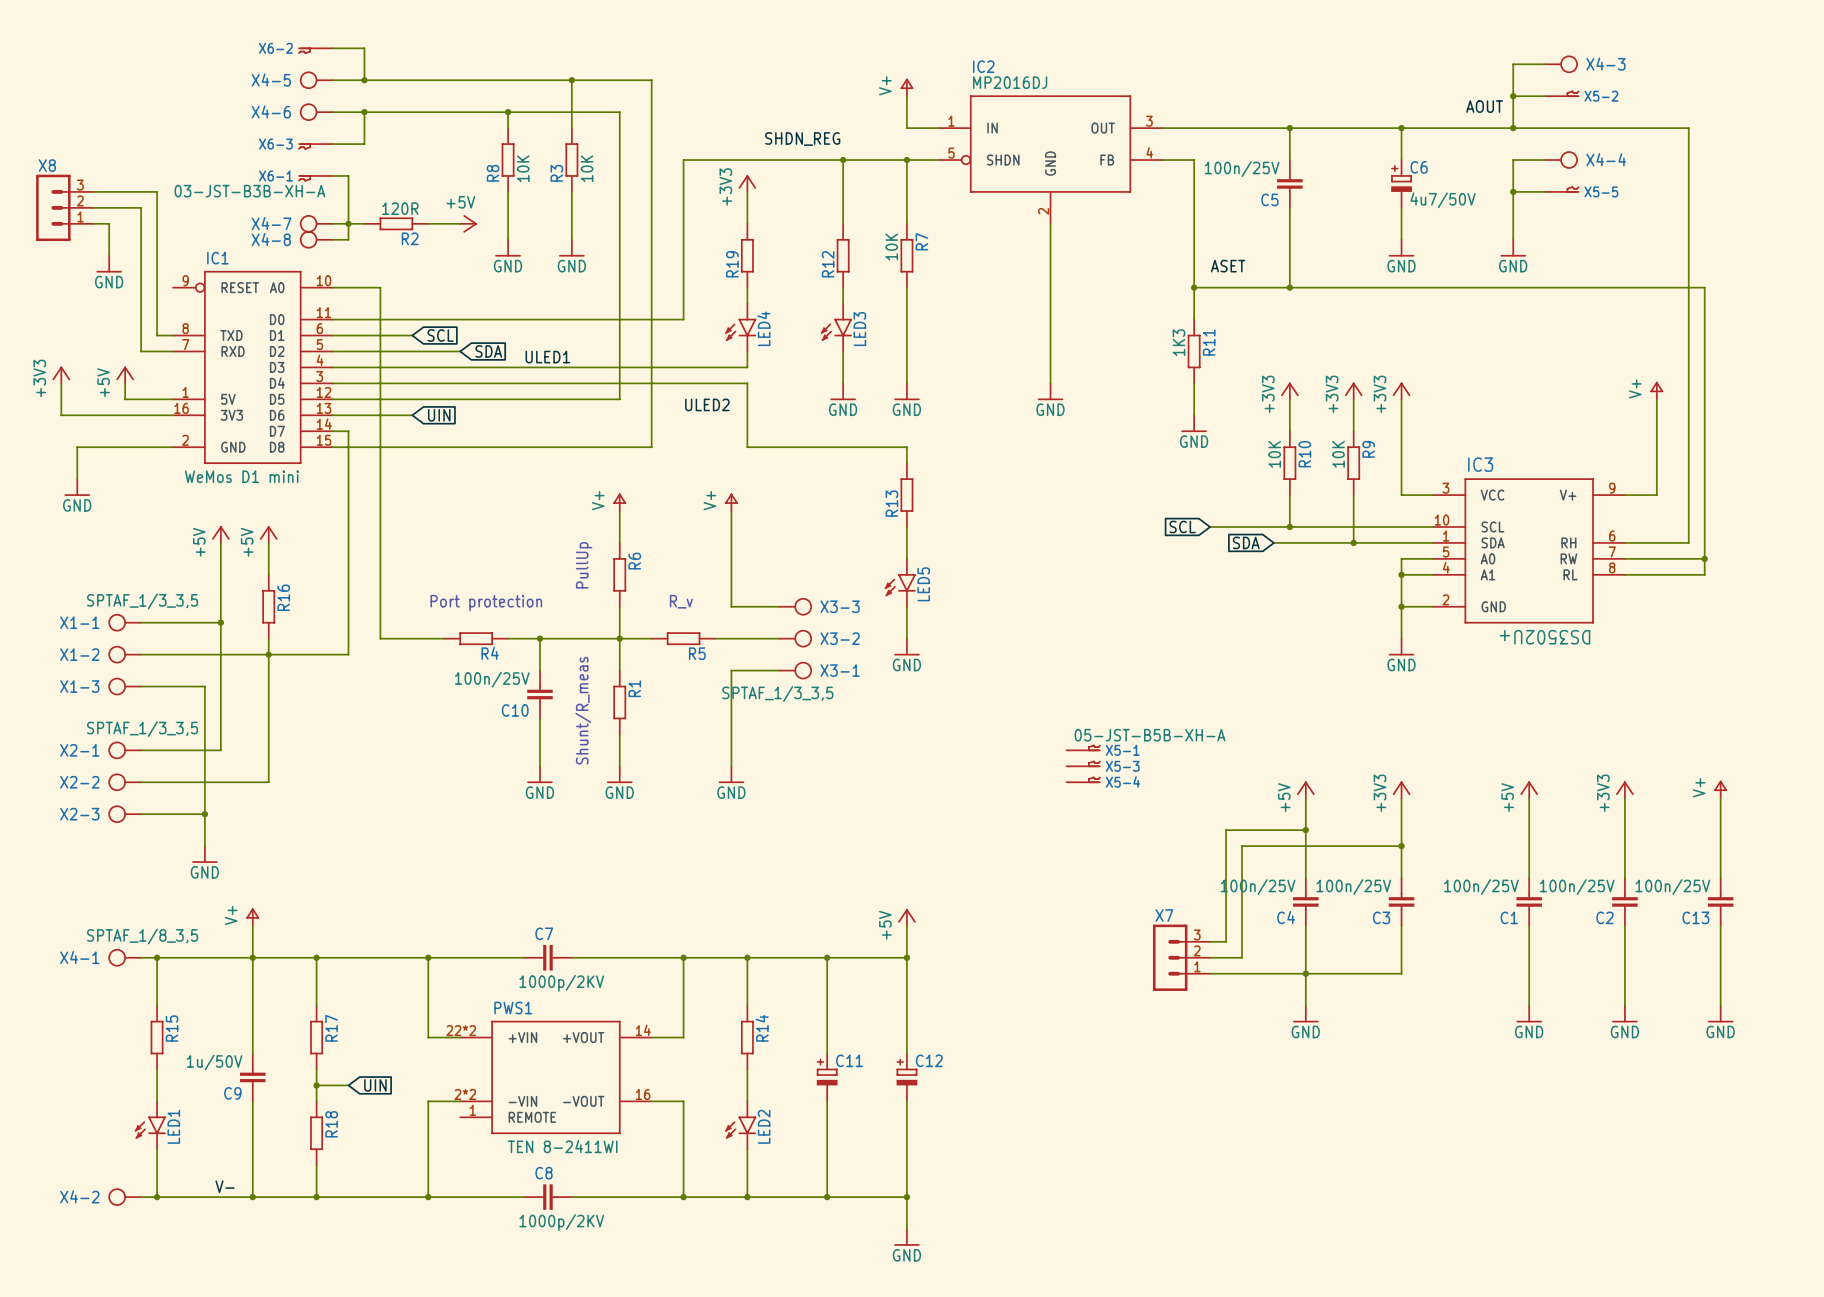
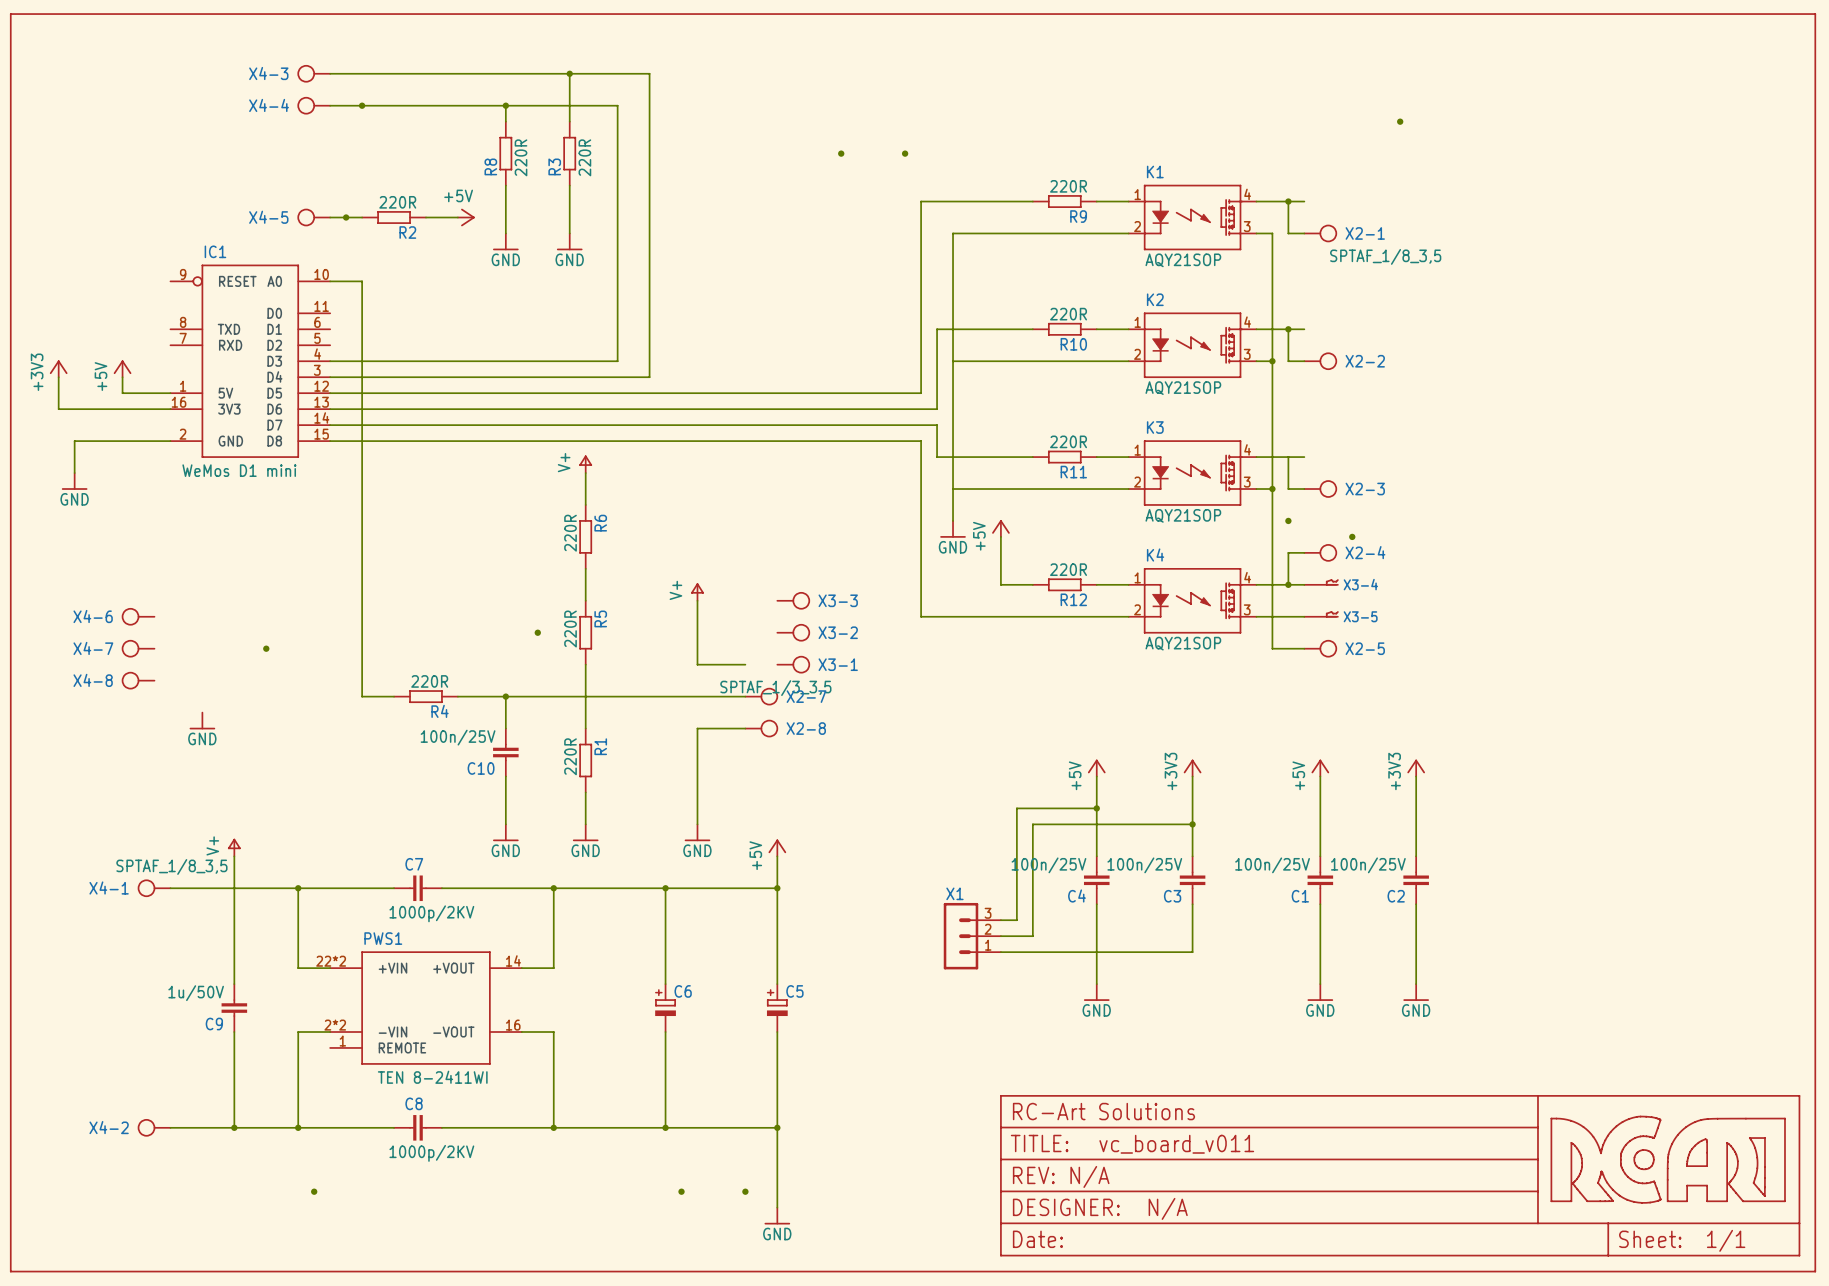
wire: (332, 48) (364, 48) (364, 80) -> none
X6-2: (315, 50) -> none
wire: (1545, 64) (1513, 64) (1513, 128) -> none
X4-3: (1561, 64) -> none
X4-5 name: X4-5 (271, 79) -> X4-3 (268, 73)
junction: (364, 80) -> none
power symbol: V+ (906, 87) -> none
X5-2: (1562, 93) -> none
wire: (906, 96) (906, 128) (938, 128) -> none
wire: (1513, 96) (1545, 96) -> none
junction: (1513, 96) -> none
label: AOUT (1484, 106) -> none
X4-6 name: X4-6 (271, 111) -> X4-4 (269, 105)
wire: (364, 112) (364, 144) (332, 144) -> none
wire: (1162, 128) (1688, 128) (1688, 542) (1624, 542) -> none
wire: (1289, 128) (1289, 160) -> none
junction: (1289, 128) -> none
wire: (1401, 128) (1401, 160) -> none
junction: (1513, 128) -> none
label: SHDN_REG (802, 139) -> none
X6-3: (315, 146) -> none
IC2: MP2016DJ (1050, 159) -> none
wire: (843, 160) (843, 223) -> none
wire: (906, 160) (906, 223) -> none
wire: (938, 160) (683, 160) (683, 319) (332, 319) -> none
wire: (1162, 160) (1194, 160) (1194, 319) -> none
C5 symbol: [1277, 160, 1303, 208] -> [766, 984, 788, 1033]
wire: (1545, 160) (1513, 160) (1513, 239) -> none
X4-4: (1561, 160) -> none
R8 value: 10K (523, 168) -> 220R (521, 157)
R3 value: 10K (587, 168) -> 220R (584, 157)
C5 value: 100n/25V (1242, 169) -> none
wire: (332, 175) (348, 175) (348, 239) (332, 239) -> none
X6-1: 03-JST-B3B-XH-A (315, 178) -> none
power symbol: +3V3 (747, 183) -> none
C6 position: (1401, 183) -> (665, 1008)
X5-5: (1562, 189) -> none
wire: (93, 191) (157, 191) (157, 335) (173, 335) -> none
wire: (747, 191) (747, 223) -> none
wire: (1513, 191) (1545, 191) -> none
junction: (1513, 191) -> none
C5 name position: C5 (1269, 199) -> C5 (794, 991)
C6 value: 4u7/50V (1443, 200) -> none
X8: (64, 207) -> none
wire: (93, 207) (141, 207) (141, 351) (173, 351) -> none
wire: none -> (1096, 201) (1128, 201)
wire: none -> (1256, 201) (1304, 201)
junction: none -> (1288, 201)
wire: (1401, 207) (1401, 239) -> none
R2 value: 120R (400, 208) -> 220R (397, 202)
wire: (93, 223) (109, 223) (109, 255) -> none
X4-7 name: X4-7 (271, 223) -> X4-5 (268, 217)
wire: (1050, 223) (1050, 383) -> none
K1: none -> AQY21SOP (1192, 217)
X4-8 position: (316, 239) -> (138, 680)
wire: none -> (1128, 233) (953, 233) (953, 520)
wire: none -> (1256, 233) (1272, 233) (1272, 648) (1304, 648)
wire: (1289, 239) (1289, 287) -> (1288, 233) (1304, 233)
power symbol: GND (1401, 248) -> none
power symbol: GND (1513, 248) -> none
R19: (747, 255) -> none
R12 rotation: 0° (843, 255) -> 90° clockwise (1064, 584)
R12 position: (843, 255) -> (1064, 584)
R7: 10K (906, 255) -> none
power symbol: GND (109, 264) -> none
R12 name position: R12 (828, 264) -> R12 (1073, 599)
label: ASET (1228, 266) -> none
wire: (364, 287) (380, 287) (380, 638) (444, 638) -> (362, 281) (362, 696) (394, 696)
wire: (747, 287) (747, 303) -> none
wire: (843, 287) (843, 303) -> none
wire: (906, 287) (906, 383) -> none
wire: (1194, 287) (1704, 287) (1704, 574) (1624, 574) -> none
junction: (1194, 287) -> none
junction: (1289, 287) -> none
LED4: (740, 327) -> none
LED3: (836, 327) -> none
wire: (332, 335) (412, 335) -> none
global label: SCL (440, 335) -> none
wire: none -> (1032, 329) (937, 329) (937, 409) (410, 409)
wire: none -> (1096, 329) (1128, 329)
wire: none -> (1256, 329) (1304, 329)
wire: none -> (1288, 329) (1288, 361) (1304, 361)
junction: none -> (1288, 329)
R11 value: 1K3 (1178, 342) -> 220R (1068, 441)
wire: (332, 351) (460, 351) -> none
global label: SDA (488, 351) -> none
wire: (747, 351) (747, 367) (619, 367) (619, 399) -> (1032, 201) (921, 201) (921, 393) (617, 393)
wire: (843, 351) (843, 383) -> none
R11 rotation: 0° (1194, 351) -> 90° clockwise (1064, 457)
R11 position: (1194, 351) -> (1064, 457)
K2: none -> AQY21SOP (1192, 345)
label: ULED1 (547, 357) -> none
wire: none -> (953, 361) (1128, 361)
wire: none -> (1256, 361) (1272, 361)
junction: none -> (1272, 361)
wire: (1194, 383) (1194, 415) -> none
power symbol: +3V3 (1289, 390) -> none
power symbol: +3V3 (1353, 390) -> none
power symbol: +3V3 (1401, 390) -> none
power symbol: V+ (1656, 390) -> none
power symbol: GND (843, 391) -> none
power symbol: GND (906, 391) -> none
power symbol: GND (1050, 391) -> none
wire: (1289, 399) (1289, 431) -> none
wire: (1353, 399) (1353, 431) -> none
wire: (1401, 399) (1401, 495) (1433, 495) -> none
wire: (1656, 399) (1656, 495) (1624, 495) -> none
label: ULED2 (707, 404) -> none
global label: UIN (439, 415) -> none
power symbol: GND (1194, 423) -> none
wire: (348, 431) (348, 654) (141, 654) -> (346, 425) (937, 425) (937, 457) (1032, 457)
wire: (651, 447) (651, 383) (747, 383) (747, 447) -> (649, 441) (745, 441)
wire: (906, 447) (906, 463) -> (905, 441) (921, 441) (921, 616) (1128, 616)
R10 value: 10K (1274, 454) -> 220R (1068, 314)
R9 value: 10K (1338, 454) -> 220R (1068, 186)
wire: none -> (1096, 457) (1128, 457)
wire: none -> (1256, 457) (1304, 457)
wire: none -> (1288, 457) (1288, 489) (1304, 489)
R10 rotation: 0° (1289, 463) -> 90° clockwise (1064, 329)
R10 position: (1289, 463) -> (1064, 329)
R9 rotation: 0° (1353, 463) -> 90° clockwise (1064, 201)
R9 position: (1353, 463) -> (1064, 201)
wire: none -> (585, 473) (585, 504)
K3: none -> AQY21SOP (1192, 473)
R13: (906, 495) -> none
wire: none -> (953, 489) (1128, 489)
wire: none -> (1256, 489) (1272, 489)
junction: none -> (1272, 489)
wire: (1289, 495) (1289, 526) -> none
wire: (1353, 495) (1353, 542) -> none
power symbol position: V+ (619, 502) -> V+ (585, 464)
power symbol: V+ (731, 502) -> none
wire: (619, 511) (619, 542) -> (585, 568) (585, 600)
wire: (731, 511) (731, 606) (779, 606) -> none
wire: (906, 526) (906, 558) -> none
global label: SCL (1182, 526) -> none
wire: (1210, 526) (1433, 526) -> none
power symbol: +5V (220, 534) -> none
power symbol: +5V (268, 534) -> none
power symbol: none -> +5V (1000, 528)
power symbol: none -> GND (953, 529)
R6 value: none -> 220R (570, 533)
wire: (220, 542) (220, 750) (141, 750) -> none
wire: (268, 542) (268, 574) -> none
wire: none -> (1000, 536) (1000, 584) (1032, 584)
global label: SDA (1246, 542) -> none
wire: (1273, 542) (1433, 542) -> none
IC3: DS3502U+ (1529, 550) -> none
wire: none -> (1304, 552) (1288, 552) (1288, 584)
X2-4: none -> (1320, 552)
wire: (1433, 558) (1401, 558) (1401, 638) -> none
wire: (1624, 558) (1704, 558) -> none
junction: (1704, 558) -> none
text: PullUp (584, 565) -> none
R6 position: (619, 574) -> (585, 536)
wire: (1401, 574) (1433, 574) -> none
junction: (1401, 574) -> none
R12 value: none -> 220R (1068, 569)
LED5: (900, 582) -> none
X3-4: none -> (1321, 582)
wire: none -> (1096, 584) (1128, 584)
wire: none -> (1256, 584) (1304, 584)
junction: none -> (1288, 584)
power symbol: none -> V+ (697, 592)
text: R_v (681, 601) -> none
text: Port protection (486, 603) -> none
R16: (268, 606) -> none
wire: (619, 606) (619, 670) -> (585, 664) (585, 728)
wire: (906, 606) (906, 638) -> none
K4: none -> AQY21SOP (1192, 600)
wire: (1401, 606) (1433, 606) -> none
junction: (1401, 606) -> none
X3-5: none -> (1321, 614)
X1-1: SPTAF_1/3_3,5 (124, 622) -> none
X4-6: none -> (138, 616)
wire: (141, 622) (220, 622) -> none
junction: (220, 622) -> none
wire: none -> (1256, 616) (1304, 616)
R5 value: none -> 220R (570, 629)
wire: (268, 638) (268, 782) (141, 782) -> none
R4 position: (476, 638) -> (425, 696)
wire: (508, 638) (651, 638) -> none
wire: (539, 638) (539, 670) -> (505, 696) (505, 728)
junction: (619, 638) -> none
R5 rotation: 0° (683, 638) -> 90° clockwise (585, 632)
R5 position: (683, 638) -> (585, 632)
wire: (715, 638) (779, 638) -> none
power symbol: GND (906, 647) -> none
power symbol: GND (1401, 647) -> none
part: none -> (913, 642)
R5 name position: R5 (697, 653) -> R5 (600, 618)
X1-2: (124, 654) -> none
X4-7: none -> (138, 648)
X2-5: none -> (1320, 648)
wire: (731, 670) (731, 766) -> (729, 664) (697, 664) (697, 600)
wire: (747, 670) (779, 670) -> none
X1-3: (124, 686) -> none
wire: (141, 686) (204, 686) (204, 846) -> none
R4 value: none -> 220R (429, 681)
C10 position: (539, 694) -> (505, 752)
wire: none -> (457, 696) (745, 696)
junction: none -> (505, 696)
R1 position: (619, 702) -> (585, 760)
X2-7: none -> (761, 696)
text: Shunt/R_meas (583, 710) -> none
wire: (539, 718) (539, 766) -> (505, 776) (505, 824)
X2-1 value: SPTAF_1/3_3,5 (142, 729) -> SPTAF_1/8_3,5 (1385, 256)
wire: (619, 734) (619, 766) -> (585, 792) (585, 824)
wire: none -> (745, 728) (697, 728) (697, 824)
X2-8: none -> (761, 728)
X5-1: 05-JST-B5B-XH-A (1083, 747) -> none
X2-1 rotation: 0° (117, 750) -> 180° (1328, 233)
X2-1 position: (124, 750) -> (1320, 233)
R1 value: none -> 220R (570, 756)
X5-3: (1083, 763) -> none
power symbol: none -> +5V (1096, 768)
power symbol: none -> +3V3 (1192, 768)
power symbol: GND (539, 774) -> none
power symbol: GND (619, 774) -> none
power symbol: GND (731, 774) -> none
X5-4: (1083, 779) -> none
X2-2 rotation: 0° (117, 782) -> 180° (1328, 361)
X2-2 position: (124, 782) -> (1320, 361)
wire: none -> (1096, 776) (1096, 856)
wire: none -> (1192, 776) (1192, 856)
power symbol position: +5V (1305, 789) -> +5V (1320, 768)
power symbol position: +3V3 (1401, 789) -> +3V3 (1416, 768)
power symbol: +5V (1529, 789) -> none
power symbol: +3V3 (1624, 789) -> none
power symbol: V+ (1720, 789) -> none
wire: (1305, 798) (1305, 878) -> (1320, 776) (1320, 856)
wire: (1401, 798) (1401, 878) -> (1416, 776) (1416, 856)
wire: (1529, 798) (1529, 878) -> none
wire: (1624, 798) (1624, 878) -> none
wire: (1720, 798) (1720, 878) -> none
X2-3 rotation: 0° (117, 814) -> 180° (1328, 489)
X2-3 position: (124, 814) -> (1320, 489)
wire: (141, 814) (204, 814) -> none
junction: (204, 814) -> none
wire: none -> (1096, 808) (1016, 808) (1016, 920) (1000, 920)
junction: none -> (1096, 808)
wire: none -> (1192, 824) (1032, 824) (1032, 936) (1000, 936)
junction: none -> (1192, 824)
wire: (1305, 830) (1226, 830) (1226, 941) (1210, 941) -> none
junction: (1305, 830) -> none
power symbol: none -> GND (505, 832)
power symbol: none -> GND (585, 832)
power symbol: none -> GND (697, 832)
wire: (1401, 846) (1241, 846) (1241, 957) (1210, 957) -> none
junction: (1401, 846) -> none
power symbol: none -> +5V (777, 847)
power symbol position: GND (204, 854) -> GND (202, 720)
wire: none -> (170, 888) (394, 888)
junction: none -> (298, 888)
junction: none -> (553, 888)
wire: none -> (665, 888) (665, 984)
junction: none -> (665, 888)
junction: none -> (777, 888)
C4 position: (1305, 901) -> (1096, 880)
C3 position: (1401, 901) -> (1192, 880)
C1 position: (1529, 901) -> (1320, 880)
C2 position: (1624, 901) -> (1416, 880)
C13: 100n/25V (1720, 901) -> none
wire: none -> (1096, 904) (1096, 984)
wire: none -> (1192, 904) (1192, 952) (1000, 952)
power symbol position: V+ (252, 917) -> V+ (234, 847)
power symbol: +5V (906, 917) -> none
wire: (252, 925) (252, 1053) -> (234, 856) (234, 984)
wire: (906, 925) (906, 1053) -> (777, 856) (777, 984)
wire: (1305, 925) (1305, 1005) -> (1320, 904) (1320, 984)
wire: (1401, 925) (1401, 973) (1210, 973) -> none
wire: (1529, 925) (1529, 1005) -> (1416, 904) (1416, 984)
wire: (1624, 925) (1624, 1005) -> none
wire: (1720, 925) (1720, 1005) -> none
X1: none -> (972, 936)
X4-1 position: (124, 957) -> (154, 888)
wire: (141, 957) (524, 957) -> none
wire: (157, 957) (157, 1005) -> none
junction: (157, 957) -> none
junction: (252, 957) -> none
wire: (316, 957) (316, 1005) -> none
junction: (316, 957) -> none
wire: (428, 957) (428, 1037) (460, 1037) -> (298, 888) (298, 968) (330, 968)
junction: (428, 957) -> none
C7 position: (547, 957) -> (418, 888)
wire: (571, 957) (906, 957) -> (441, 888) (777, 888)
wire: (683, 957) (683, 1037) (651, 1037) -> (553, 888) (553, 968) (521, 968)
junction: (683, 957) -> none
wire: (747, 957) (747, 1005) -> none
junction: (747, 957) -> none
wire: (827, 957) (827, 1053) -> none
junction: (827, 957) -> none
junction: (906, 957) -> none
X7: (1181, 957) -> none
junction: (1305, 973) -> none
power symbol: none -> GND (1096, 992)
power symbol: none -> GND (1416, 992)
power symbol position: GND (1305, 1014) -> GND (1320, 992)
power symbol: GND (1529, 1014) -> none
power symbol: GND (1624, 1014) -> none
power symbol: GND (1720, 1014) -> none
R15: (157, 1037) -> none
R17: (316, 1037) -> none
wire: none -> (665, 1032) (665, 1127)
R14: (747, 1037) -> none
wire: none -> (777, 1032) (777, 1207)
wire: (157, 1069) (157, 1101) -> none
wire: (316, 1069) (316, 1101) -> none
wire: (747, 1069) (747, 1101) -> none
C9 position: (252, 1077) -> (234, 1008)
PWS1 position: (555, 1077) -> (425, 1008)
C11: (827, 1077) -> none
C12: (906, 1077) -> none
wire: (316, 1085) (348, 1085) -> none
junction: (316, 1085) -> none
global label: UIN (375, 1085) -> none
wire: (252, 1101) (252, 1197) -> (234, 1032) (234, 1127)
wire: (460, 1101) (428, 1101) (428, 1197) -> (330, 1032) (298, 1032) (298, 1127)
wire: (651, 1101) (683, 1101) (683, 1197) -> (521, 1032) (553, 1032) (553, 1127)
wire: (827, 1101) (827, 1197) -> none
wire: (906, 1101) (906, 1229) -> none
LED1: (150, 1125) -> none
LED2: (740, 1125) -> none
wire: none -> (170, 1127) (394, 1127)
junction: none -> (234, 1127)
junction: none -> (298, 1127)
R18: (316, 1133) -> none
junction: none -> (553, 1127)
junction: none -> (665, 1127)
junction: none -> (777, 1127)
wire: (157, 1149) (157, 1197) -> none
wire: (747, 1149) (747, 1197) -> none
wire: (316, 1165) (316, 1197) -> none
part: none -> (1400, 1175)
label: V- (224, 1186) -> none
X4-2 position: (124, 1197) -> (154, 1127)
wire: (141, 1197) (524, 1197) -> none
junction: (157, 1197) -> none
junction: (252, 1197) -> none
junction: (428, 1197) -> none
C8 position: (547, 1197) -> (418, 1127)
wire: (571, 1197) (906, 1197) -> (441, 1127) (777, 1127)
junction: (827, 1197) -> none
junction: (906, 1197) -> none
power symbol position: GND (906, 1237) -> GND (777, 1216)

